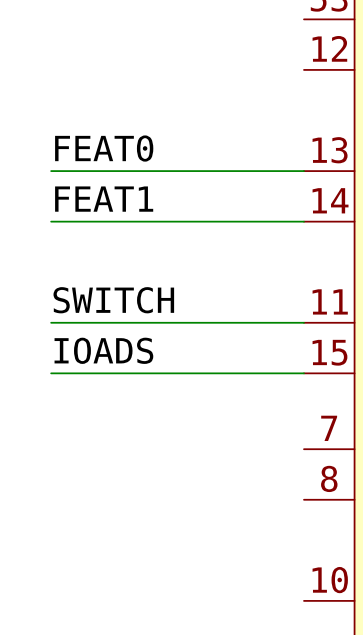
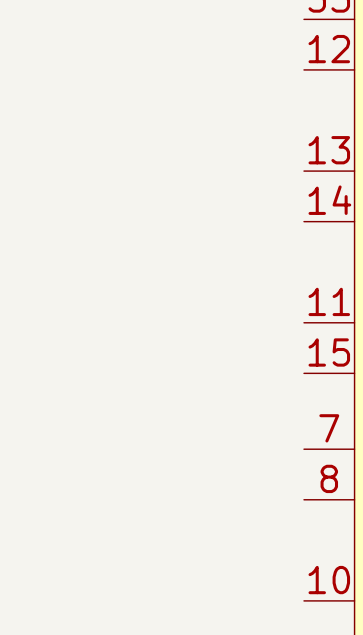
label: FEAT0 (104, 148) -> none
wire: (51, 171) (303, 171) -> none
label: FEAT1 (104, 199) -> none
wire: (51, 221) (303, 221) -> none
label: SWITCH (113, 300) -> none
wire: (51, 322) (303, 322) -> none
label: IOADS (103, 350) -> none
wire: (51, 373) (303, 373) -> none

